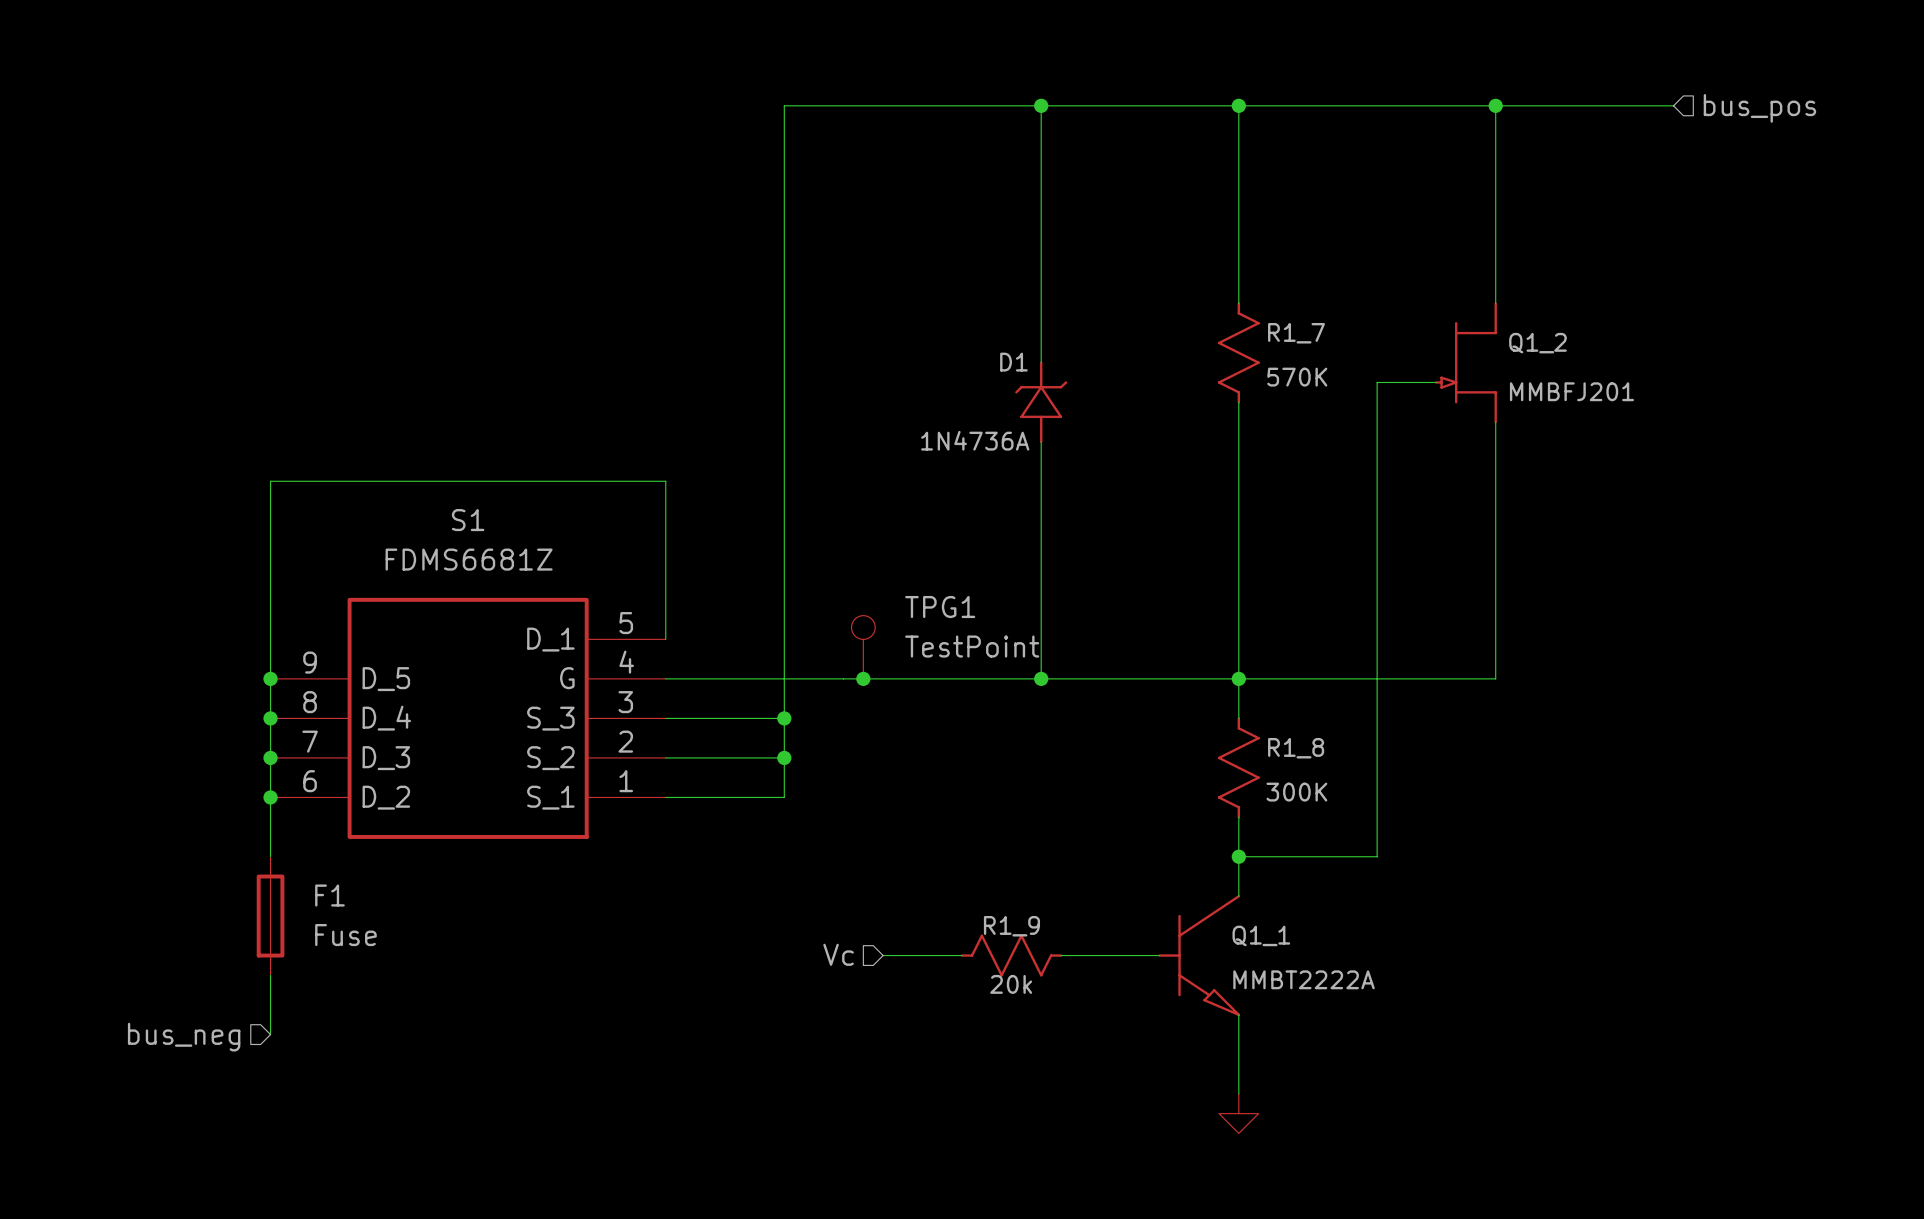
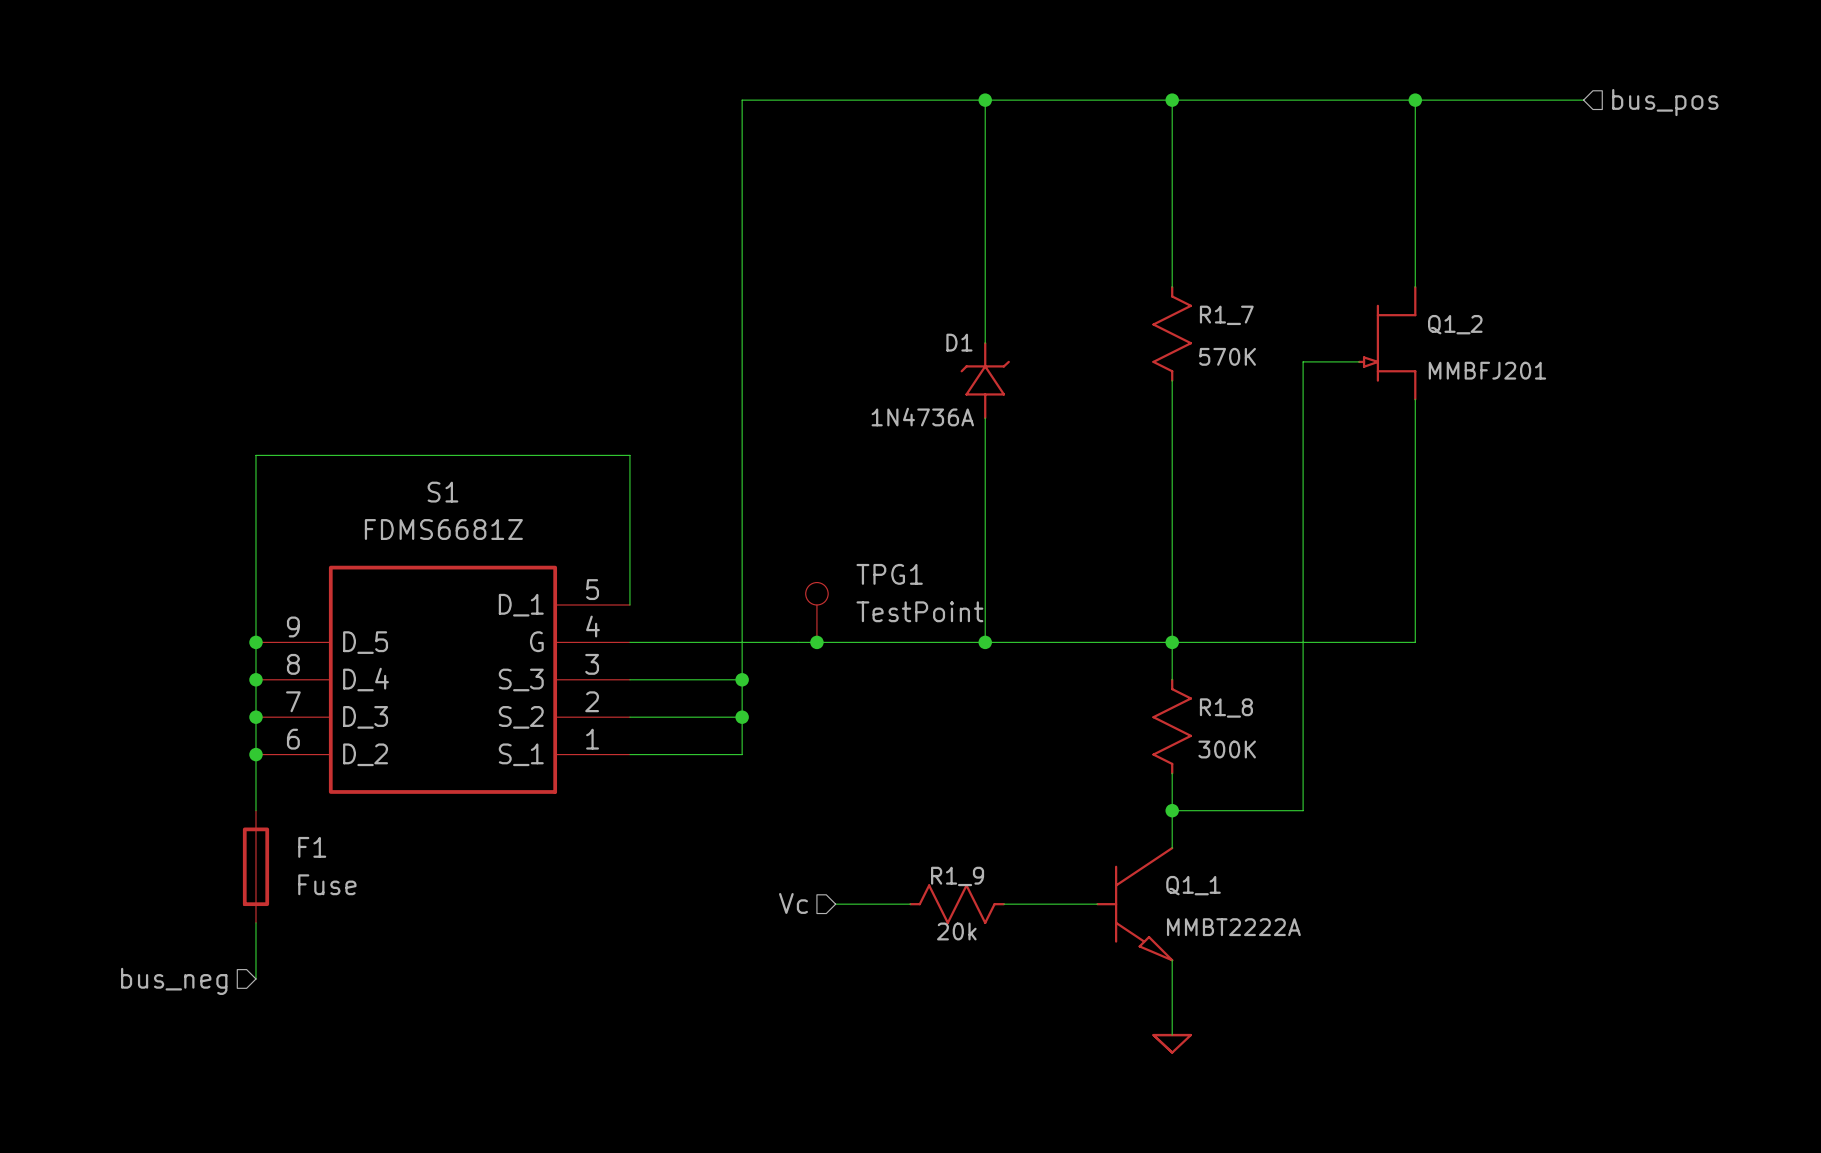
power symbol shape: [1219, 1093, 1259, 1134] -> [1152, 1033, 1193, 1054]

